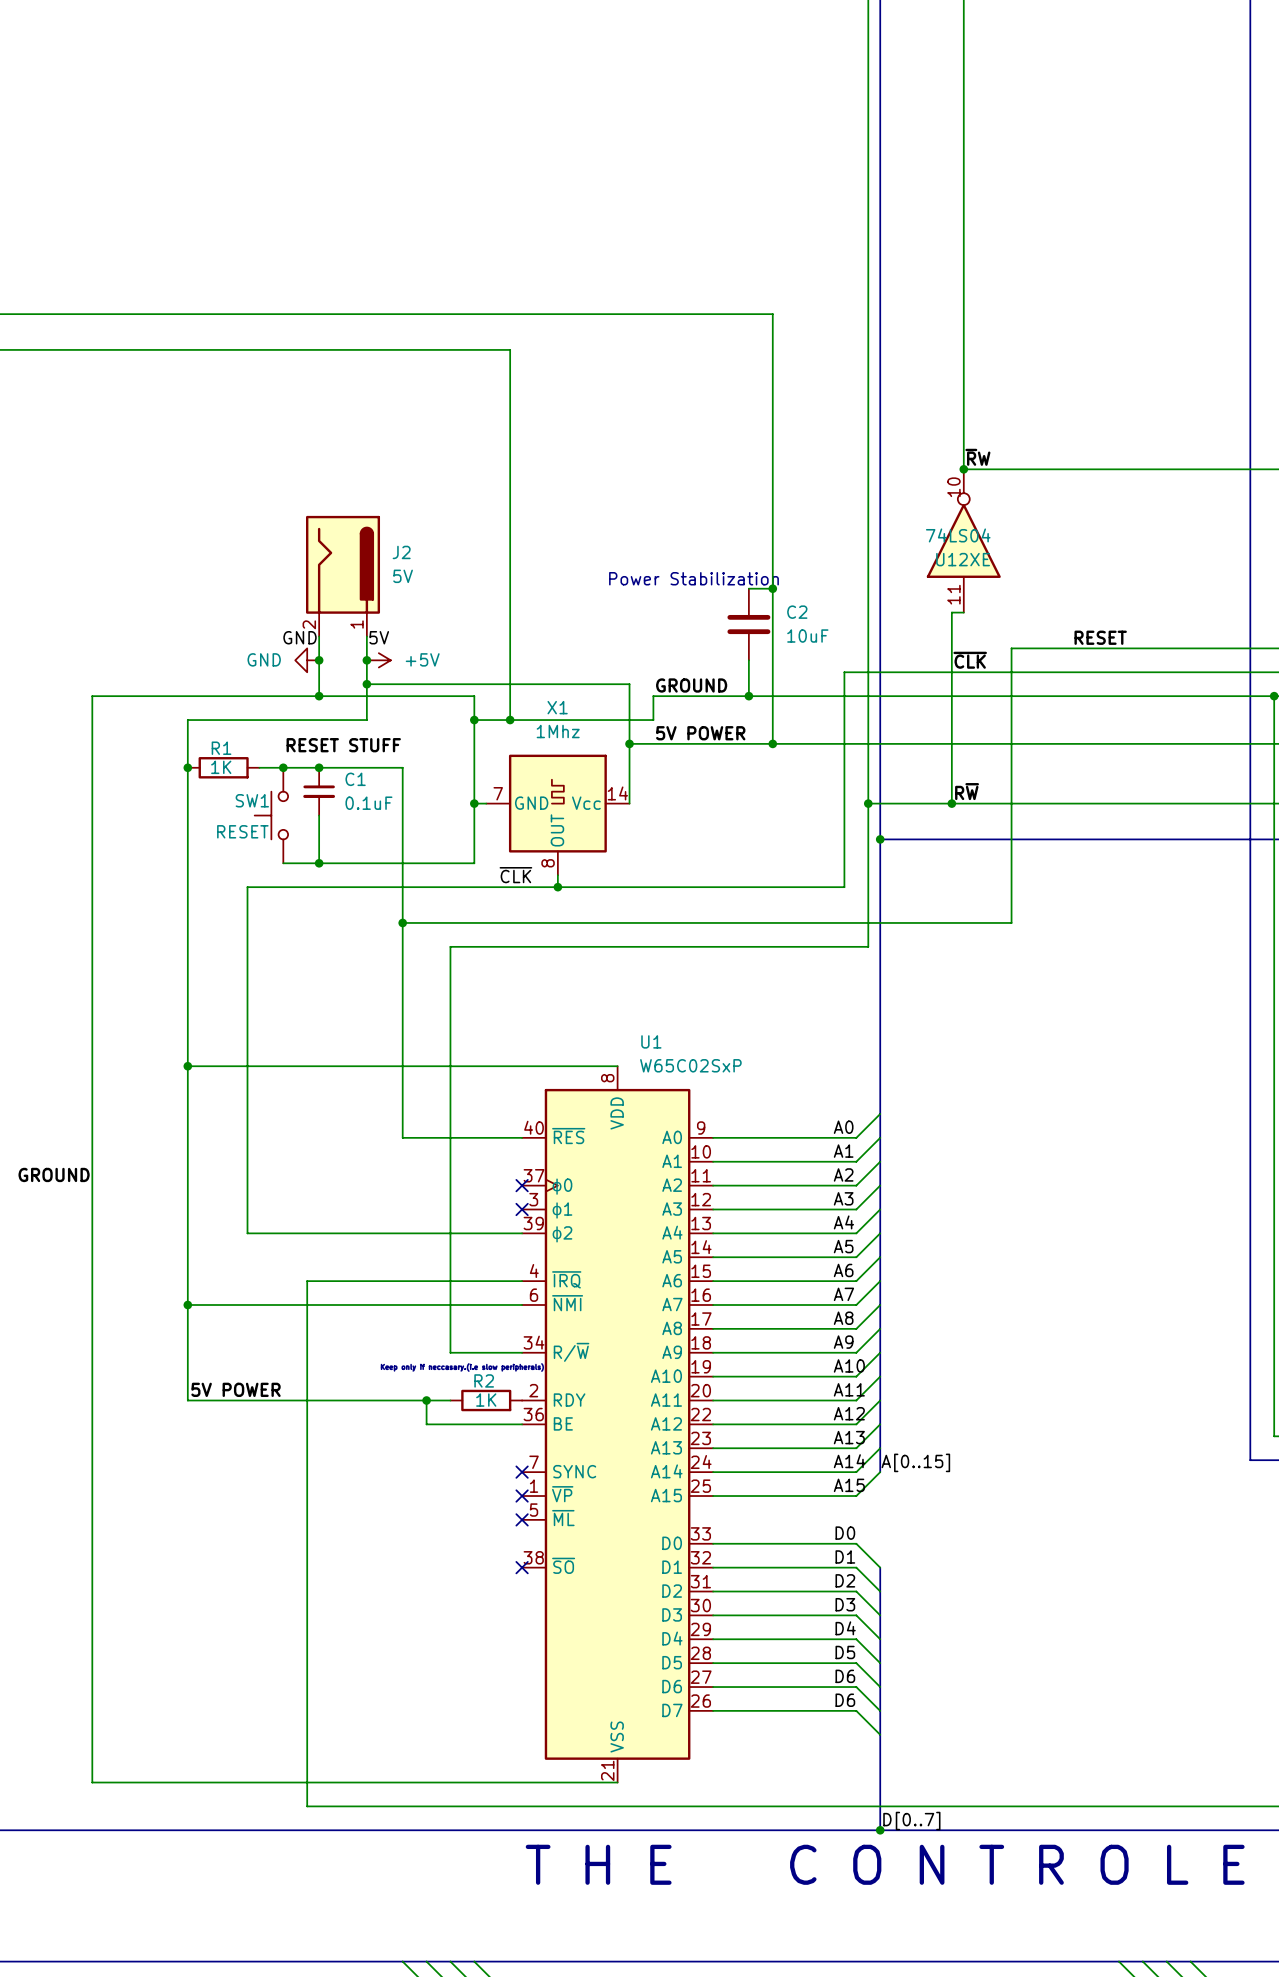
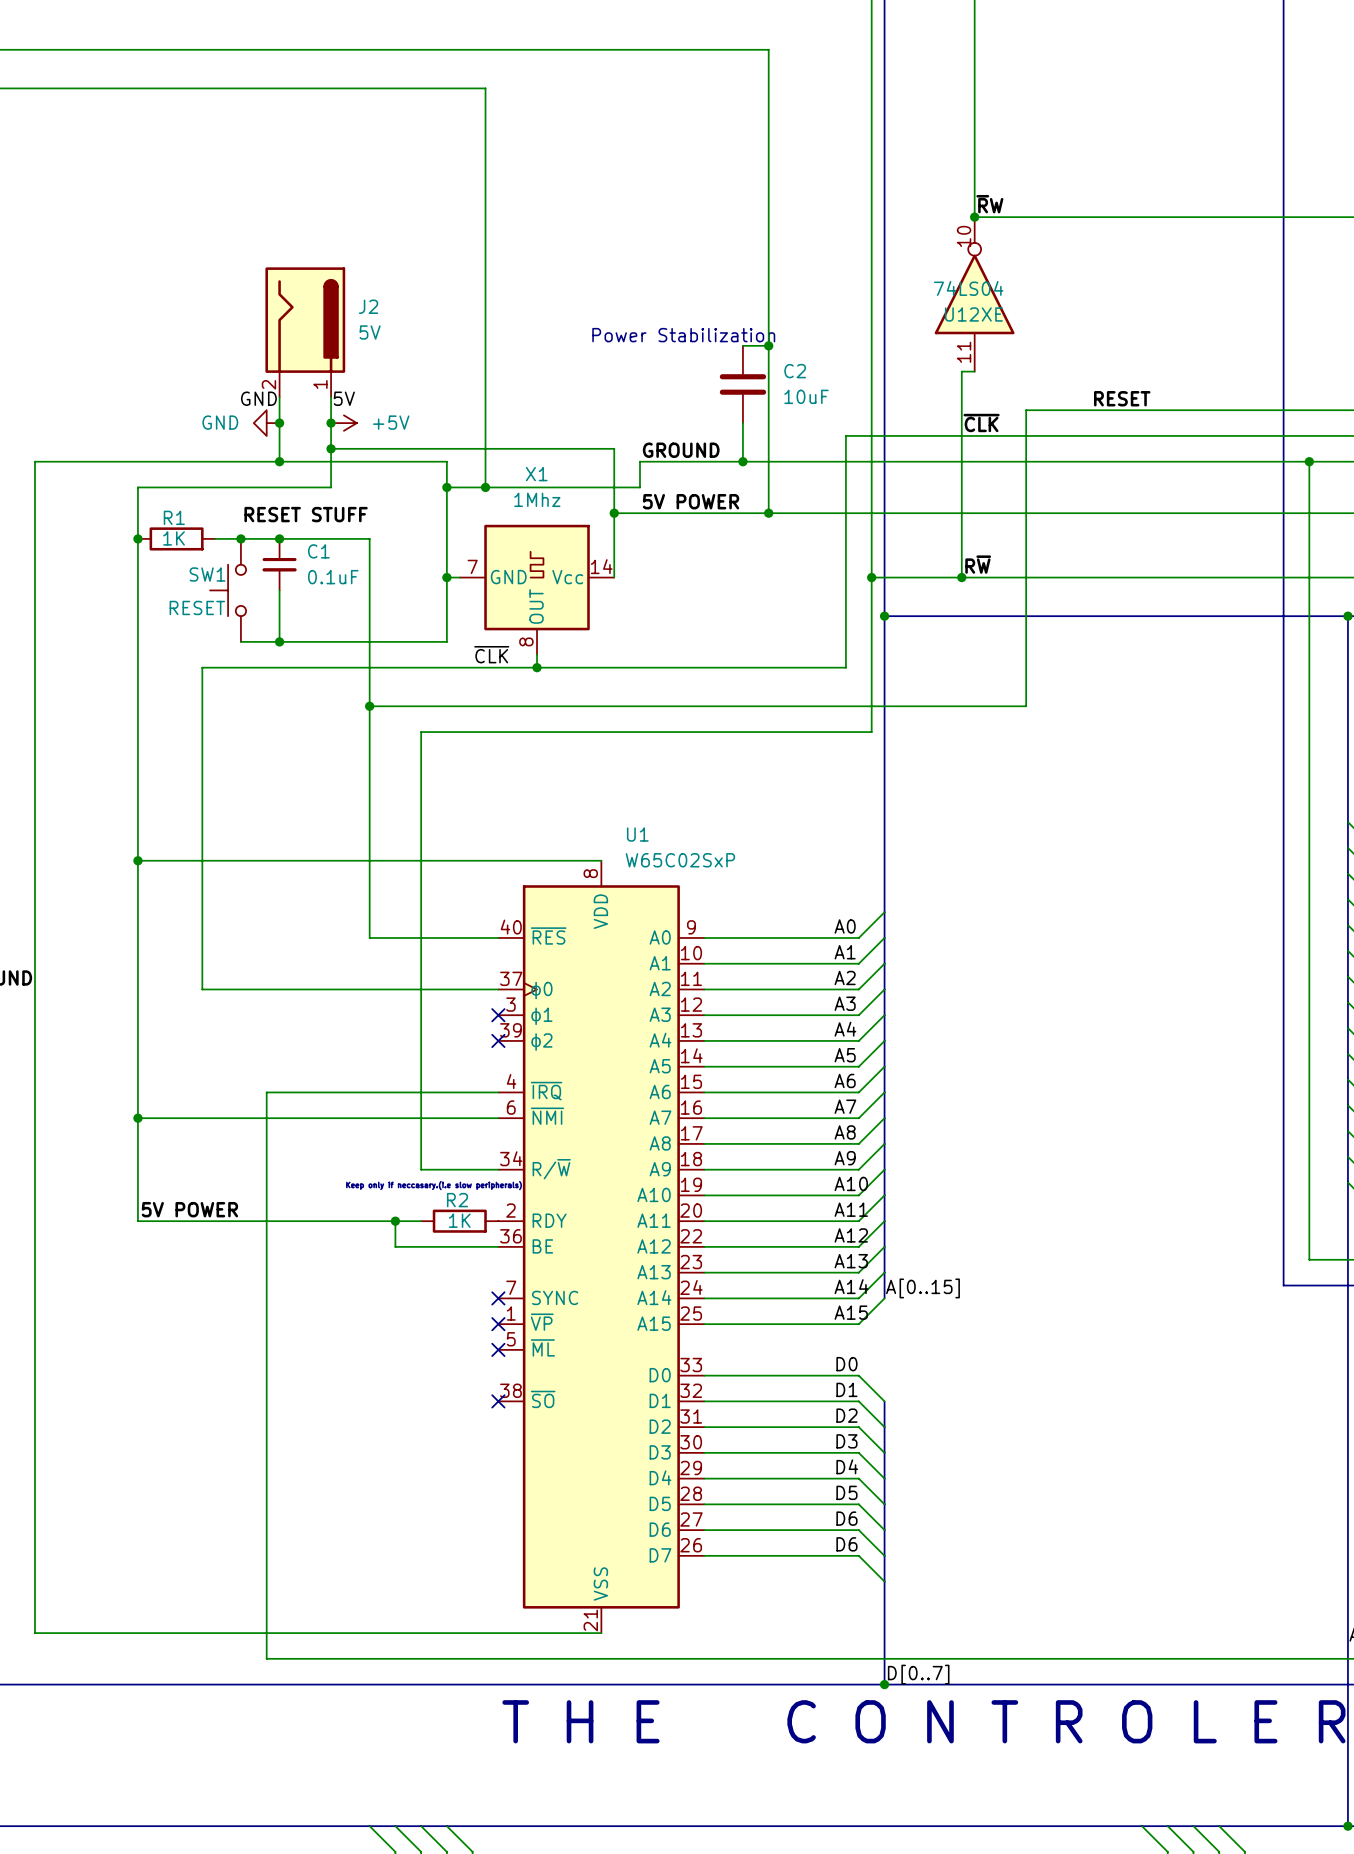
wire: (247, 1185) (247, 1233) (522, 1233) -> (202, 989) (498, 989)
no-connect mark position: (522, 1185) -> (498, 1040)

